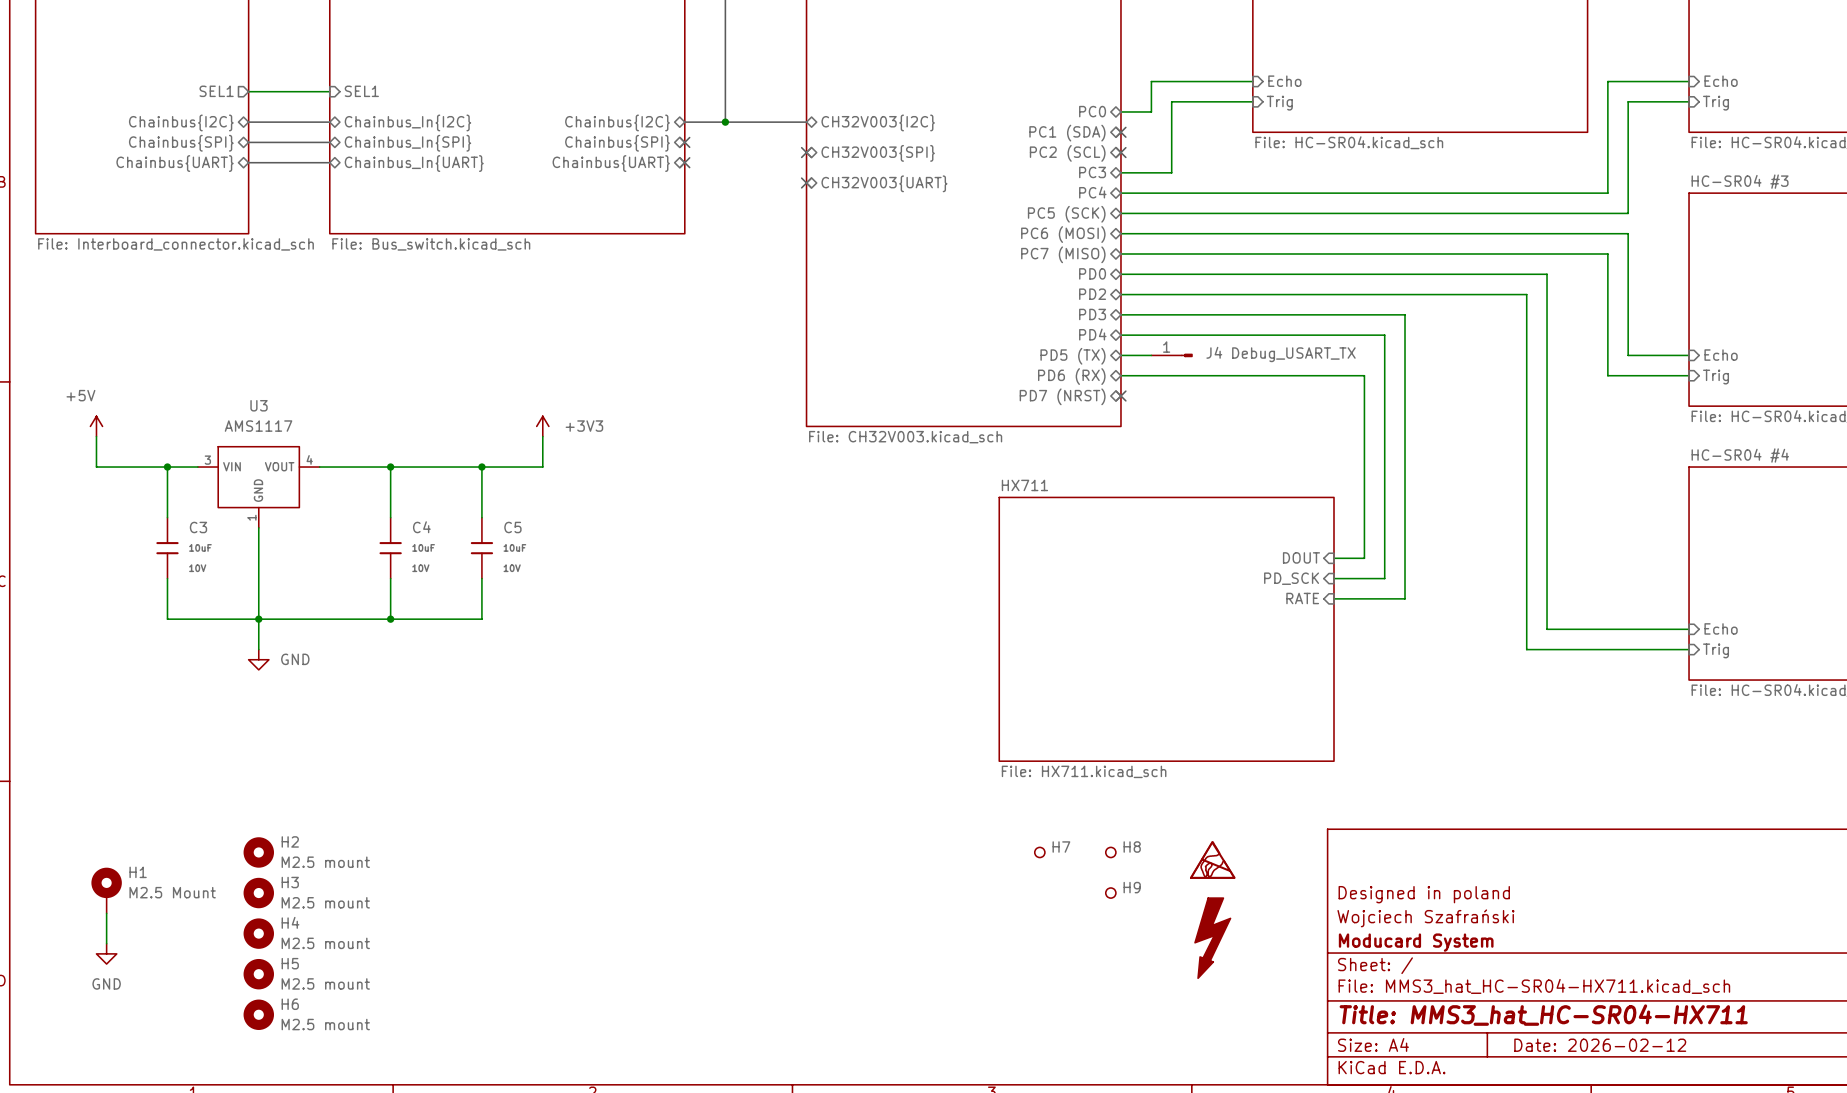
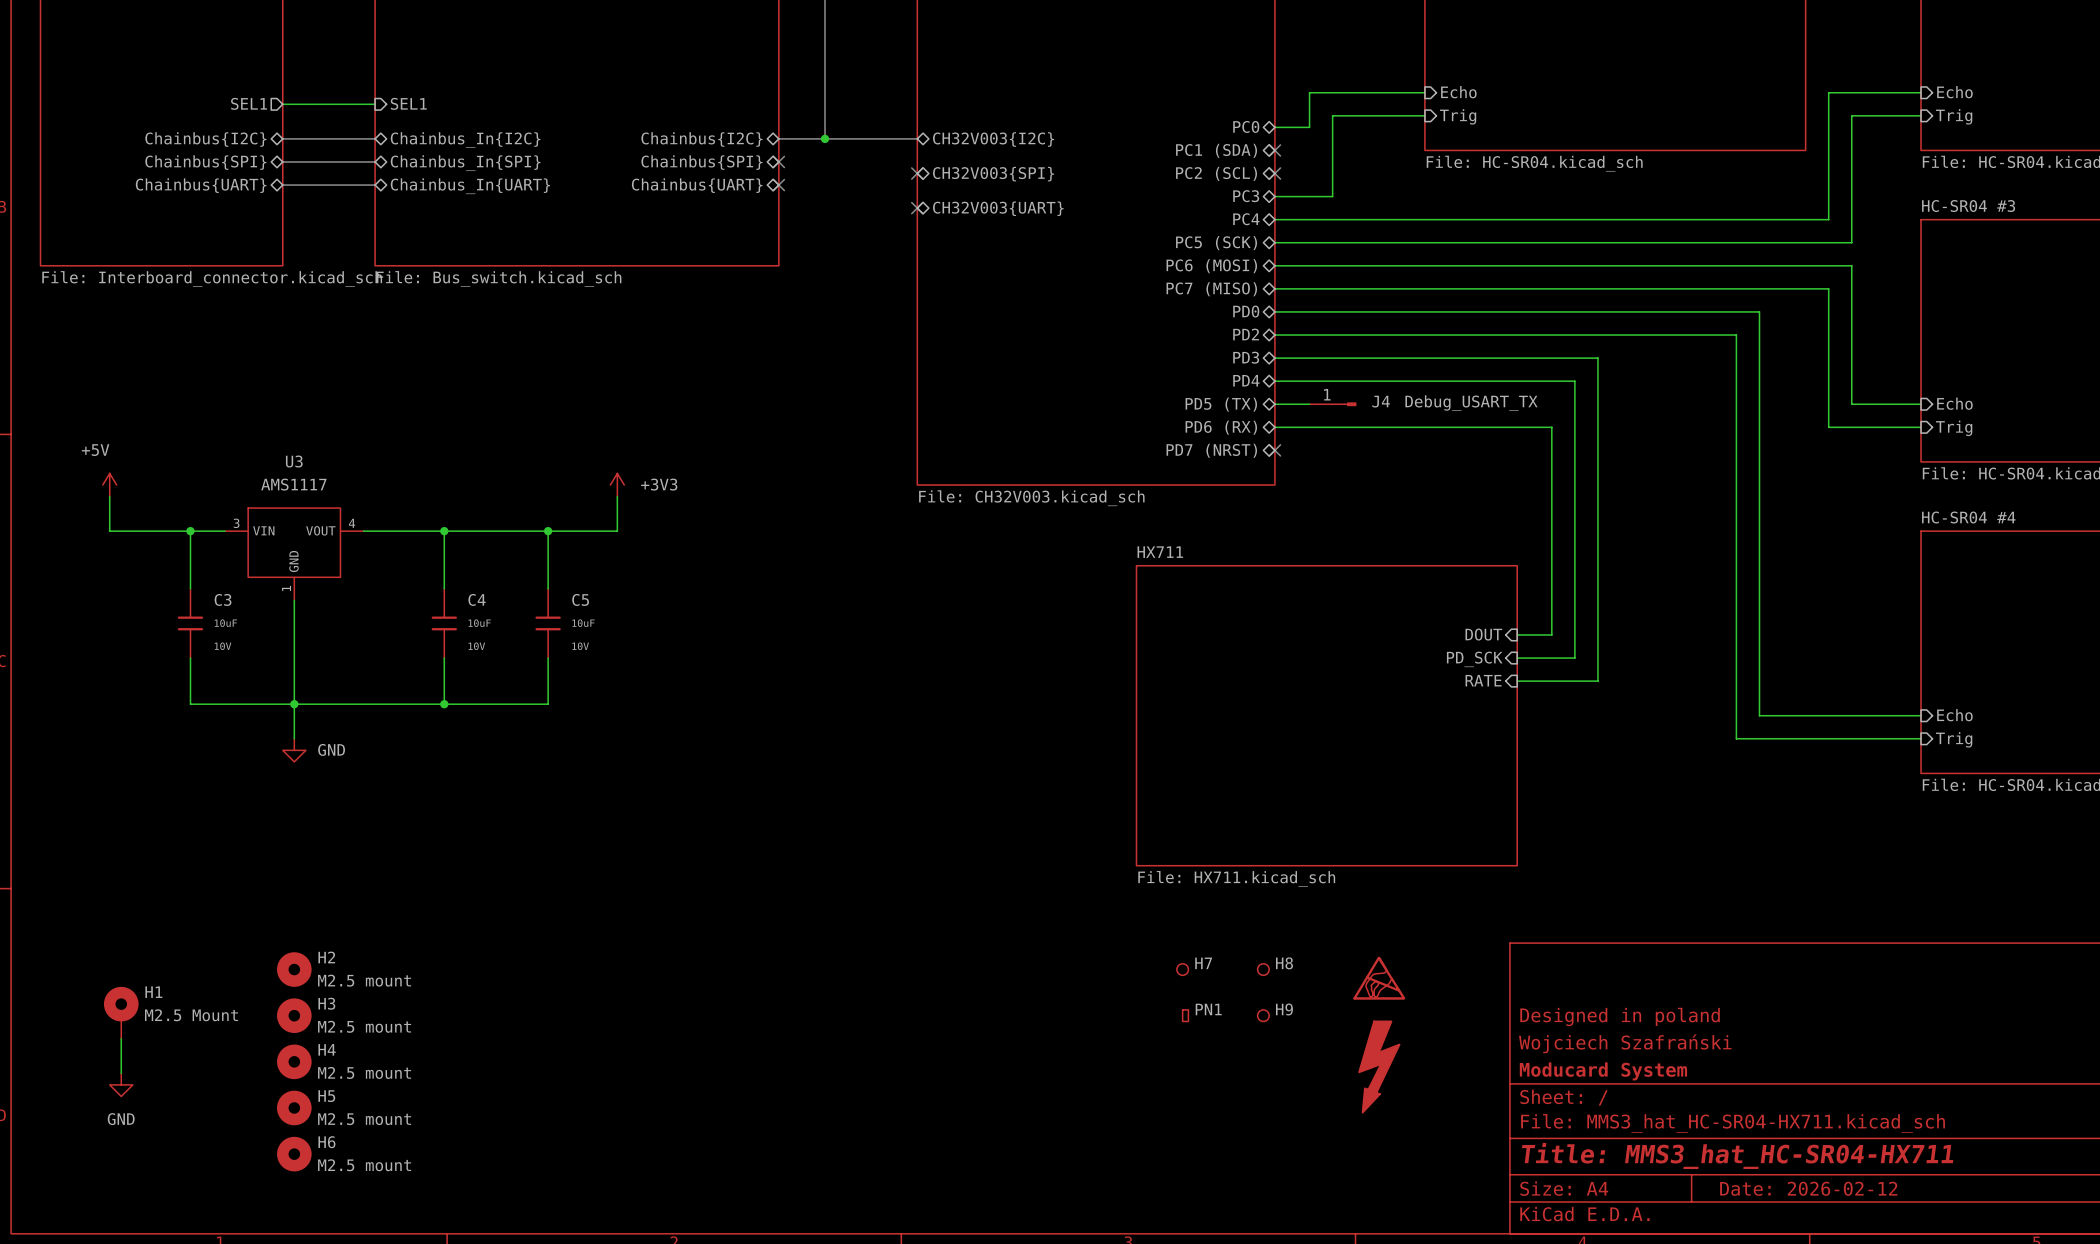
PN1: none -> (1185, 1015)

